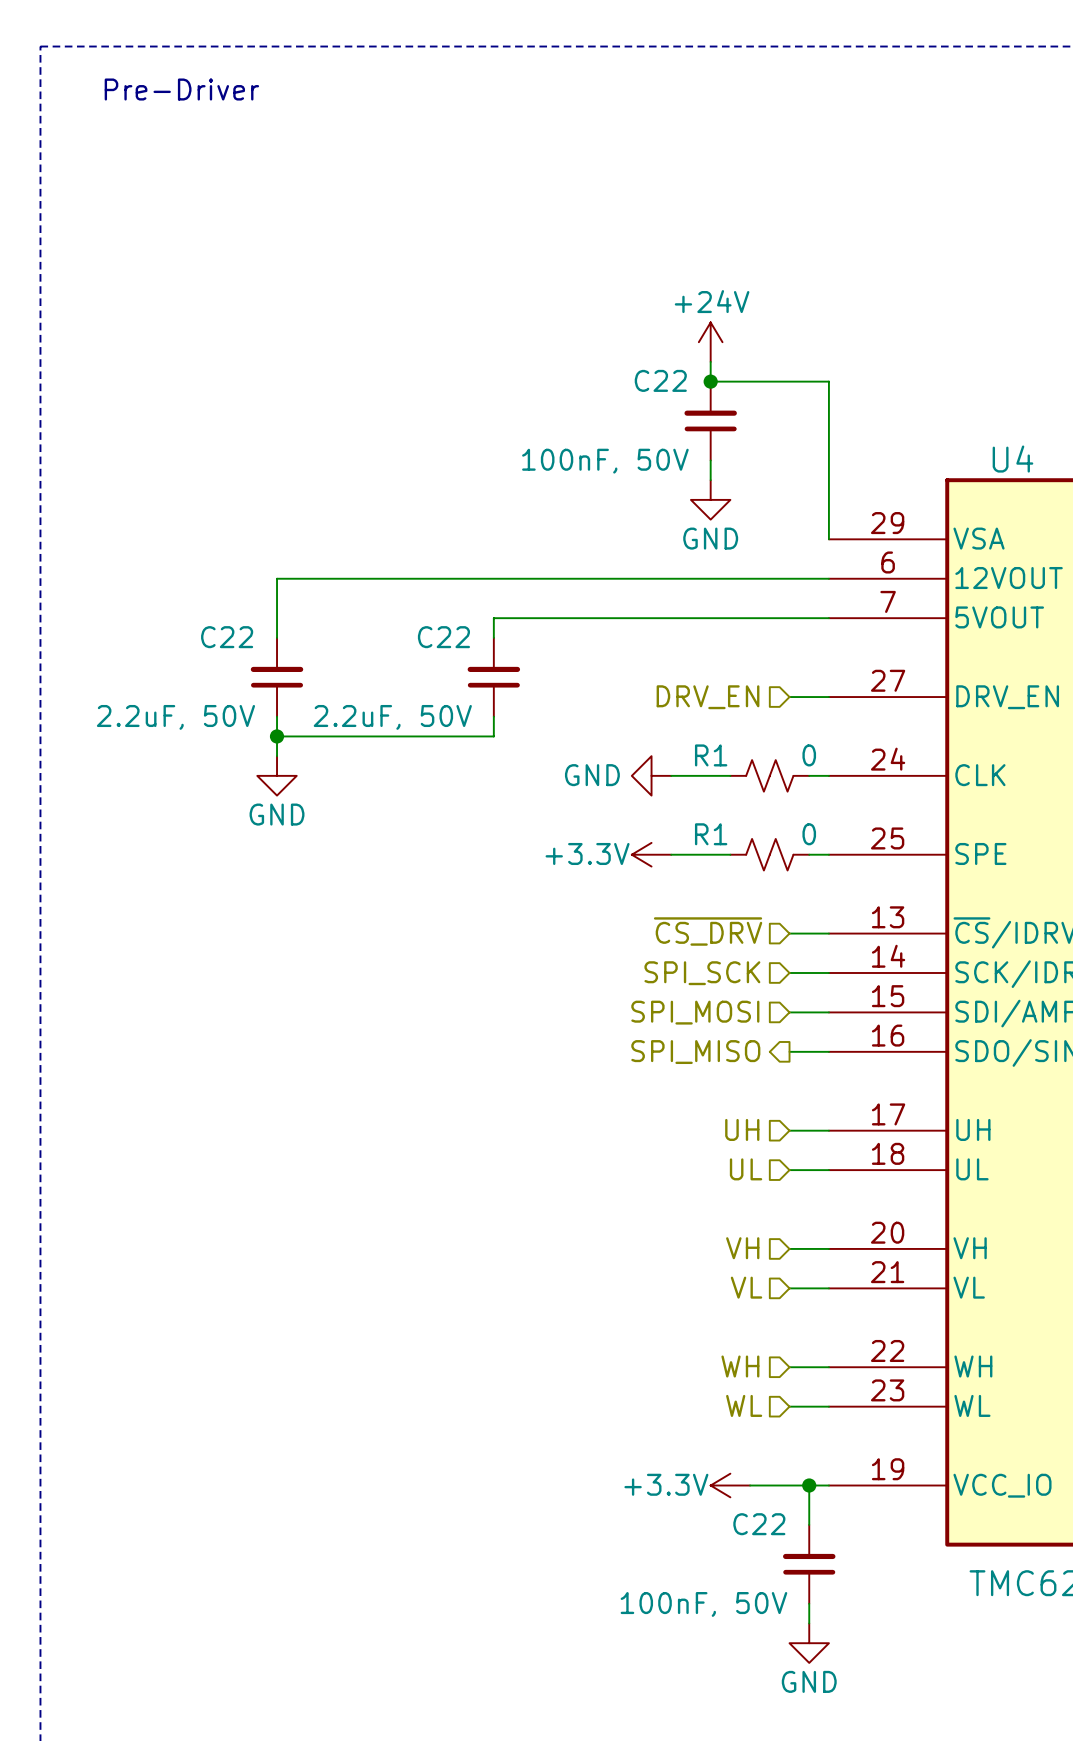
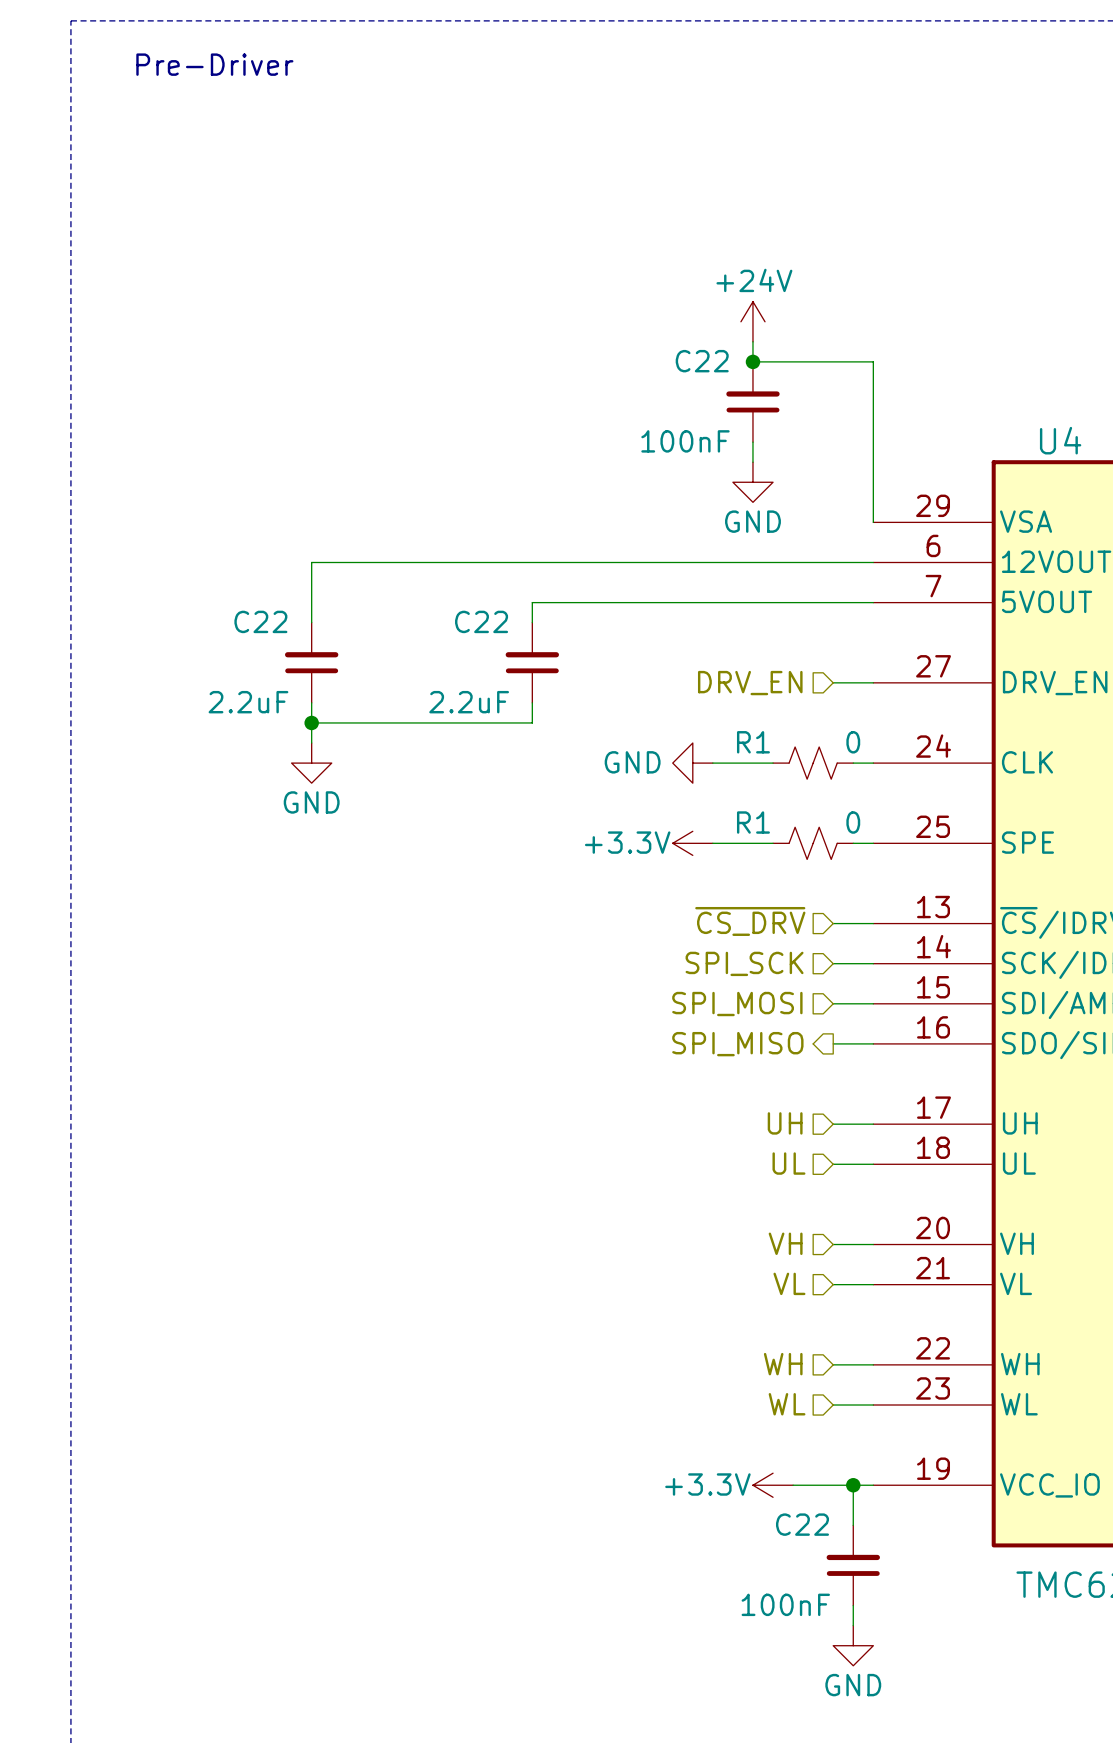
C22 value: 100nF, 50V (605, 461) -> 100nF (685, 441)
C22 value: 2.2uF, 50V (175, 717) -> 2.2uF (248, 702)
C22 value: 2.2uF, 50V (392, 717) -> 2.2uF (469, 702)
C22 value: 100nF, 50V (703, 1604) -> 100nF (785, 1604)

